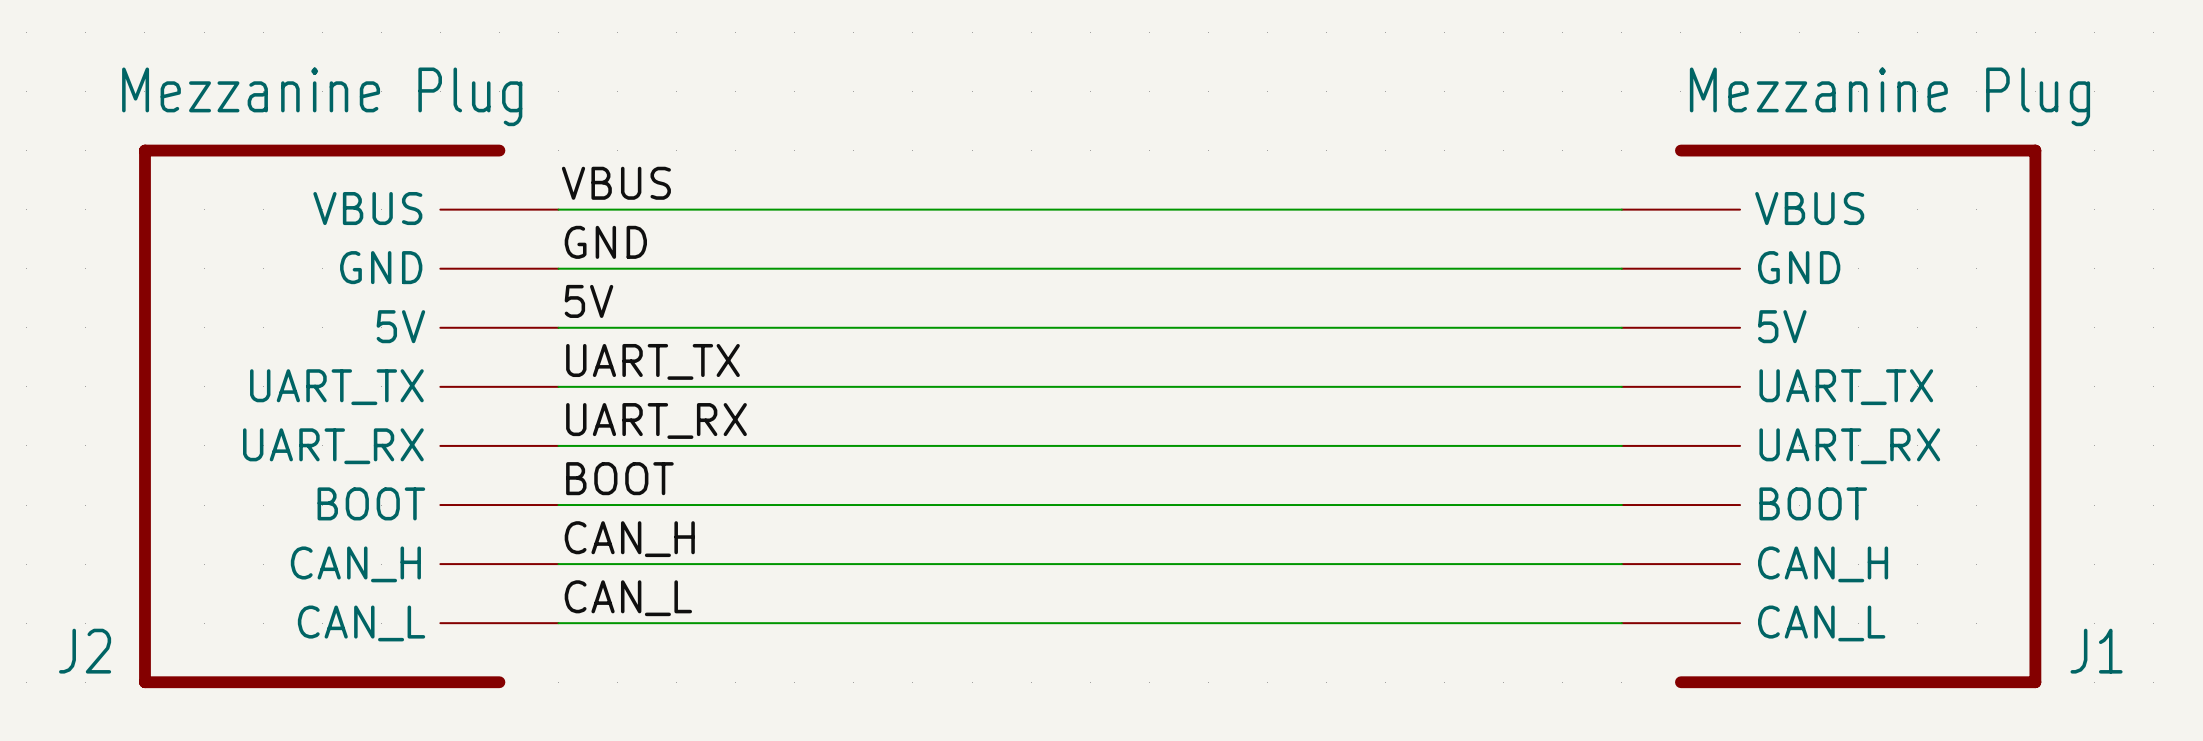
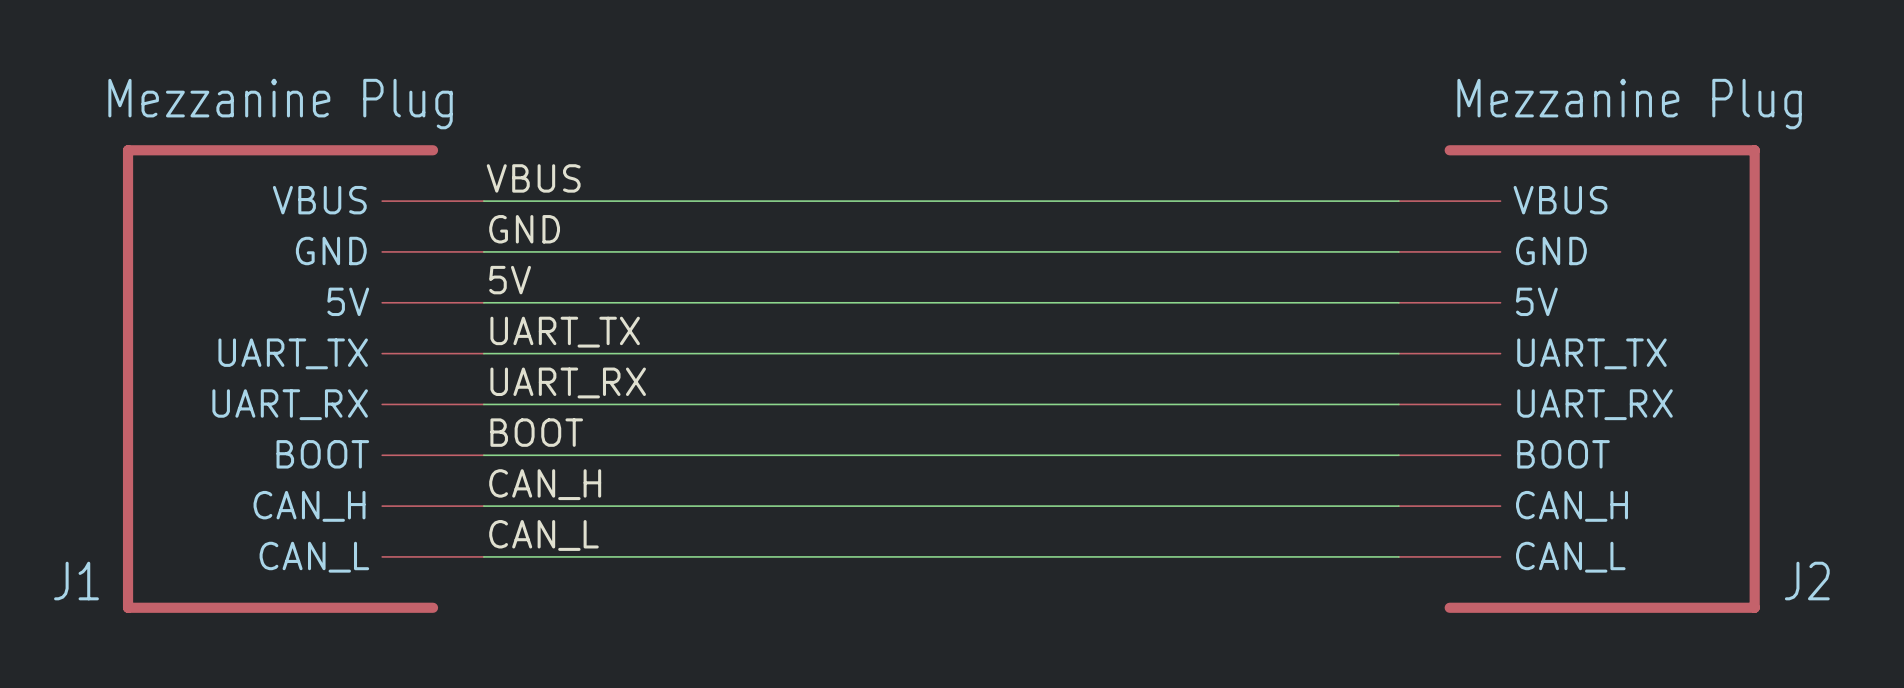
J2 name: J2 (85, 651) -> J1 (76, 581)
J1 name: J1 (2096, 651) -> J2 (1807, 581)

